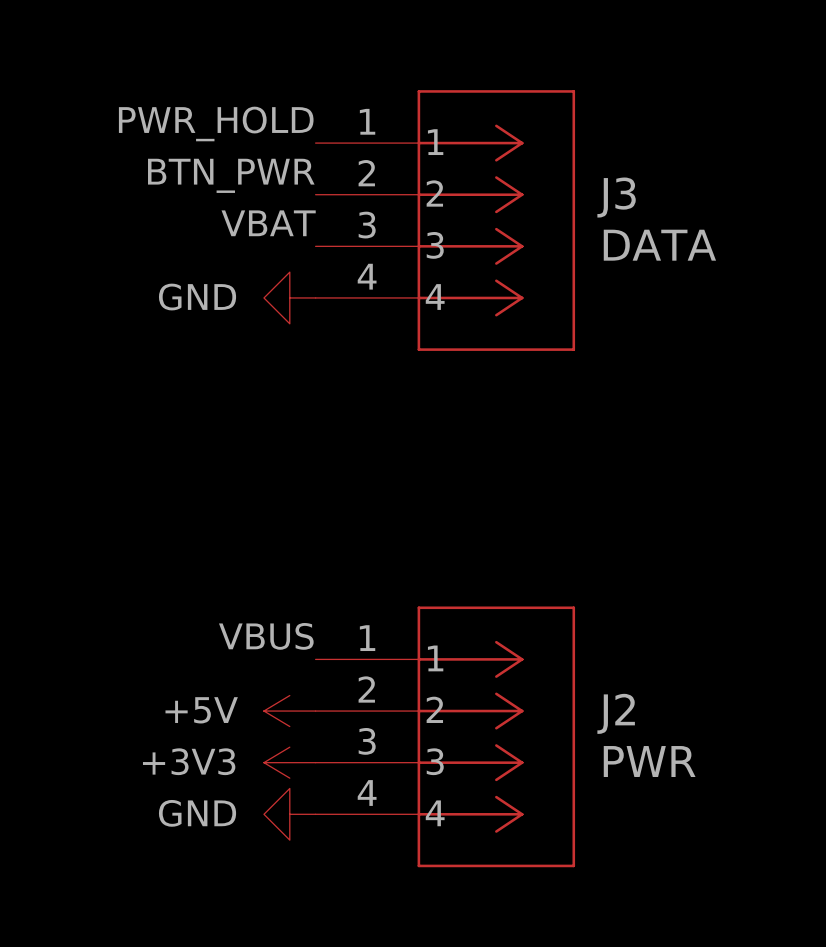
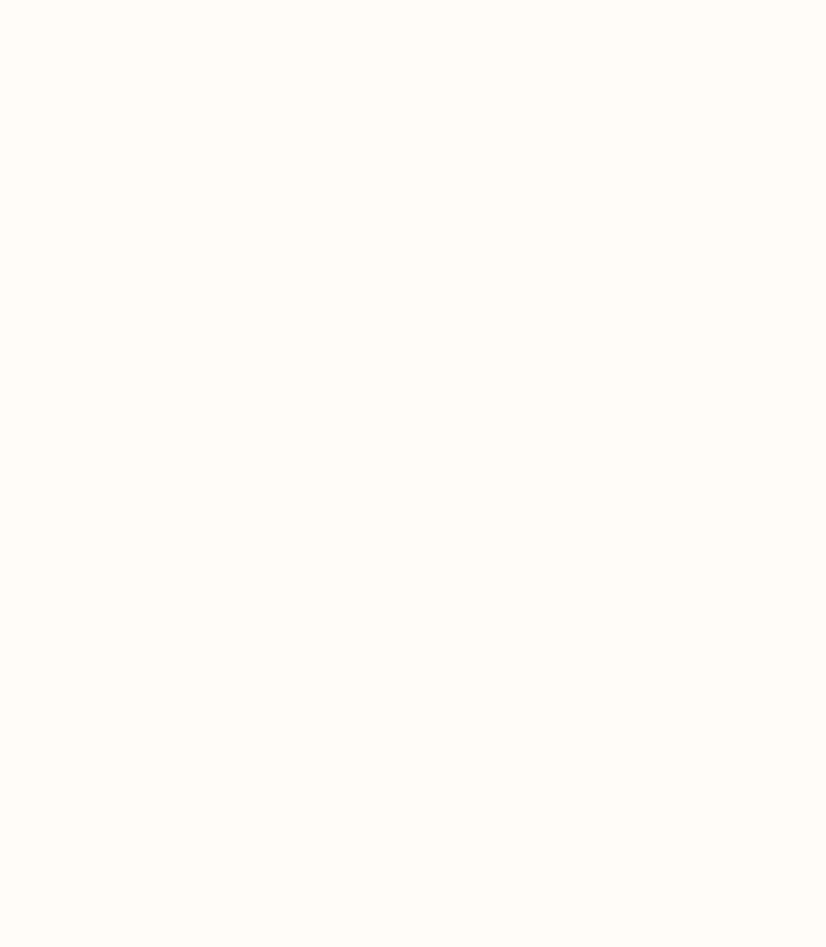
label: PWR_HOLD (216, 123) -> none
label: BTN_PWR (231, 175) -> none
J3: DATA (445, 220) -> none
label: VBAT (268, 223) -> none
power symbol: GND (289, 297) -> none
label: VBUS (266, 636) -> none
power symbol: +5V (289, 711) -> none
J2: PWR (445, 736) -> none
power symbol: +3V3 (289, 762) -> none
power symbol: GND (289, 814) -> none

